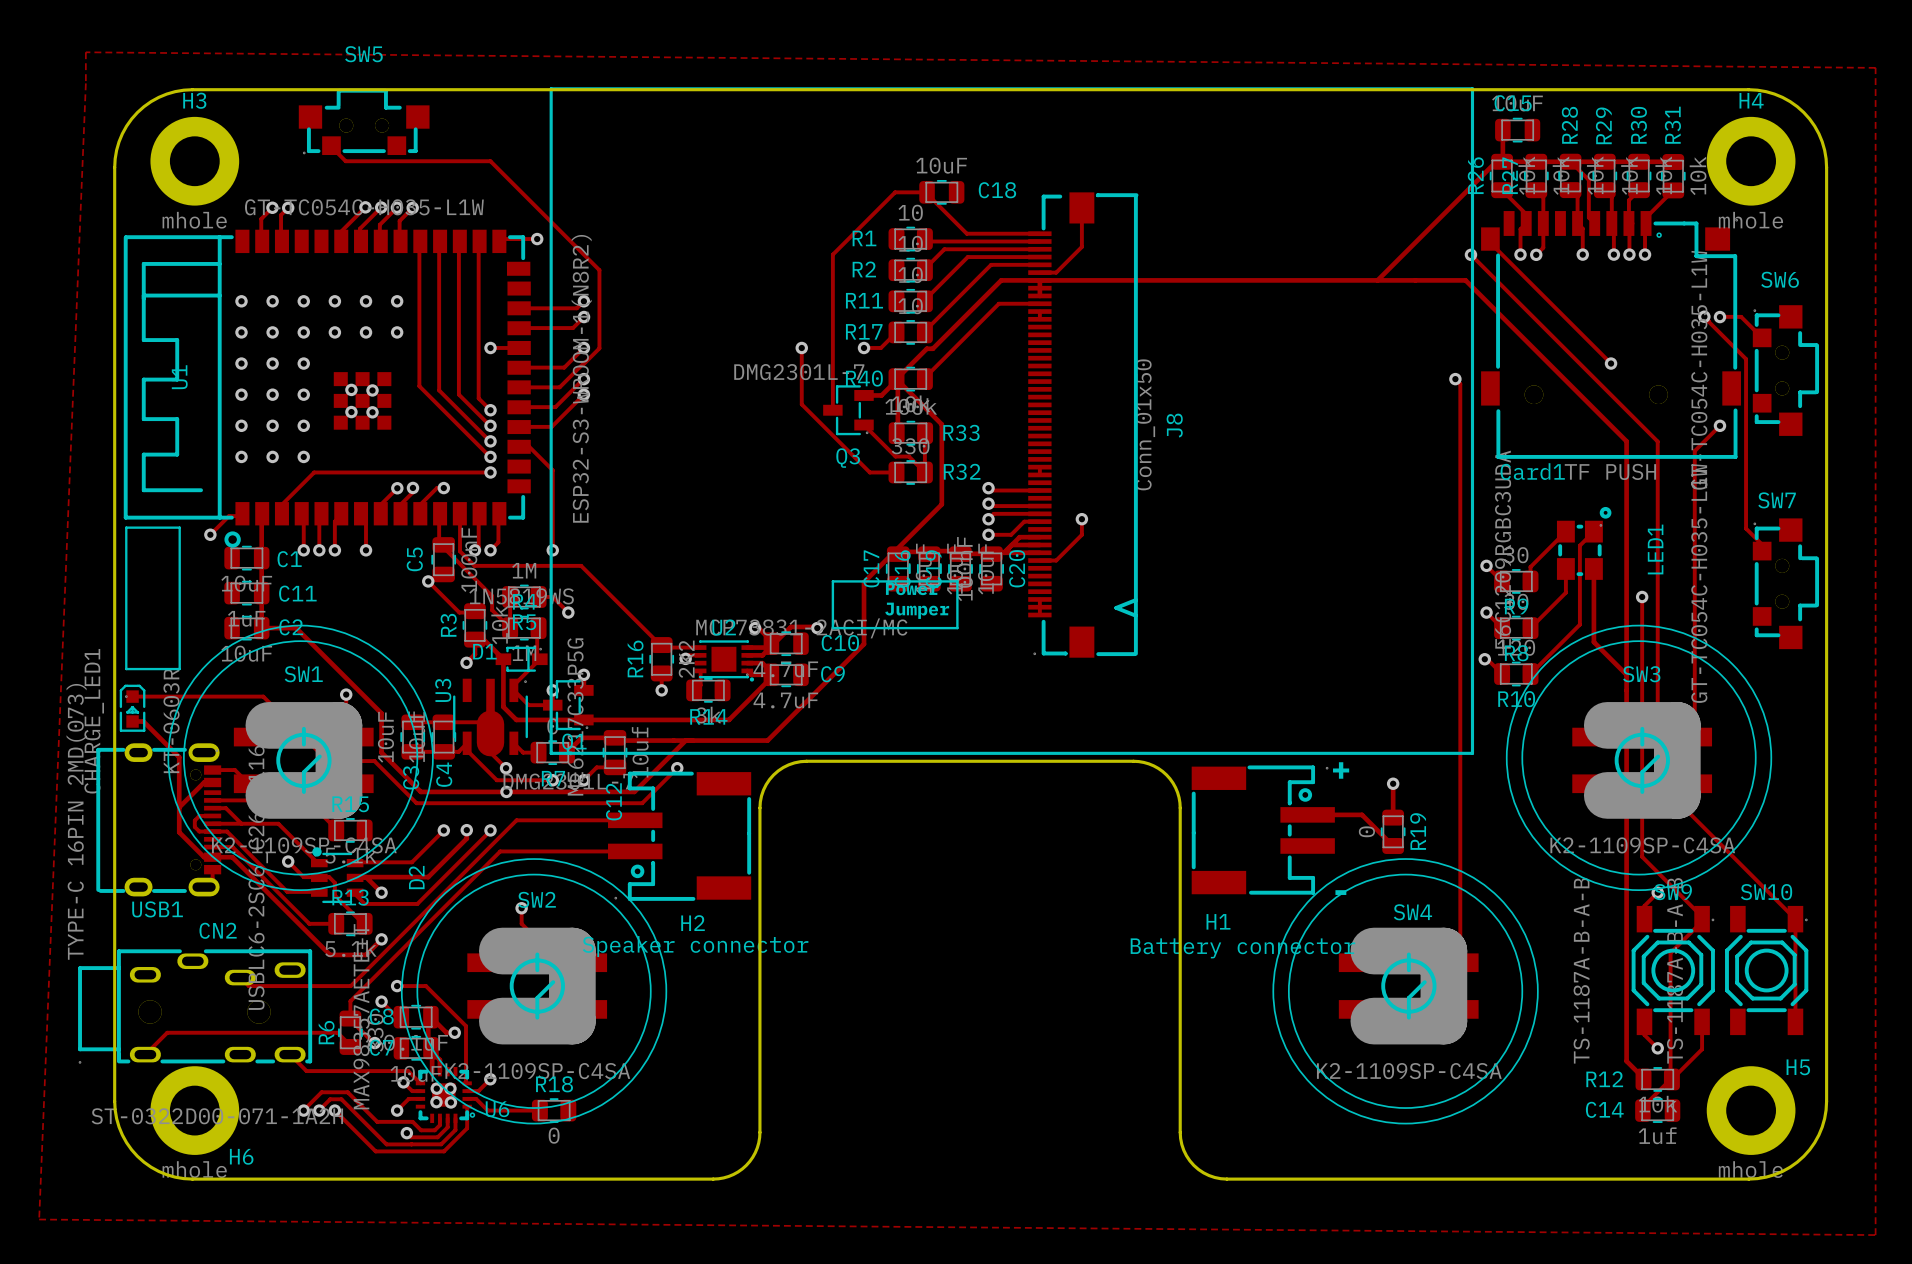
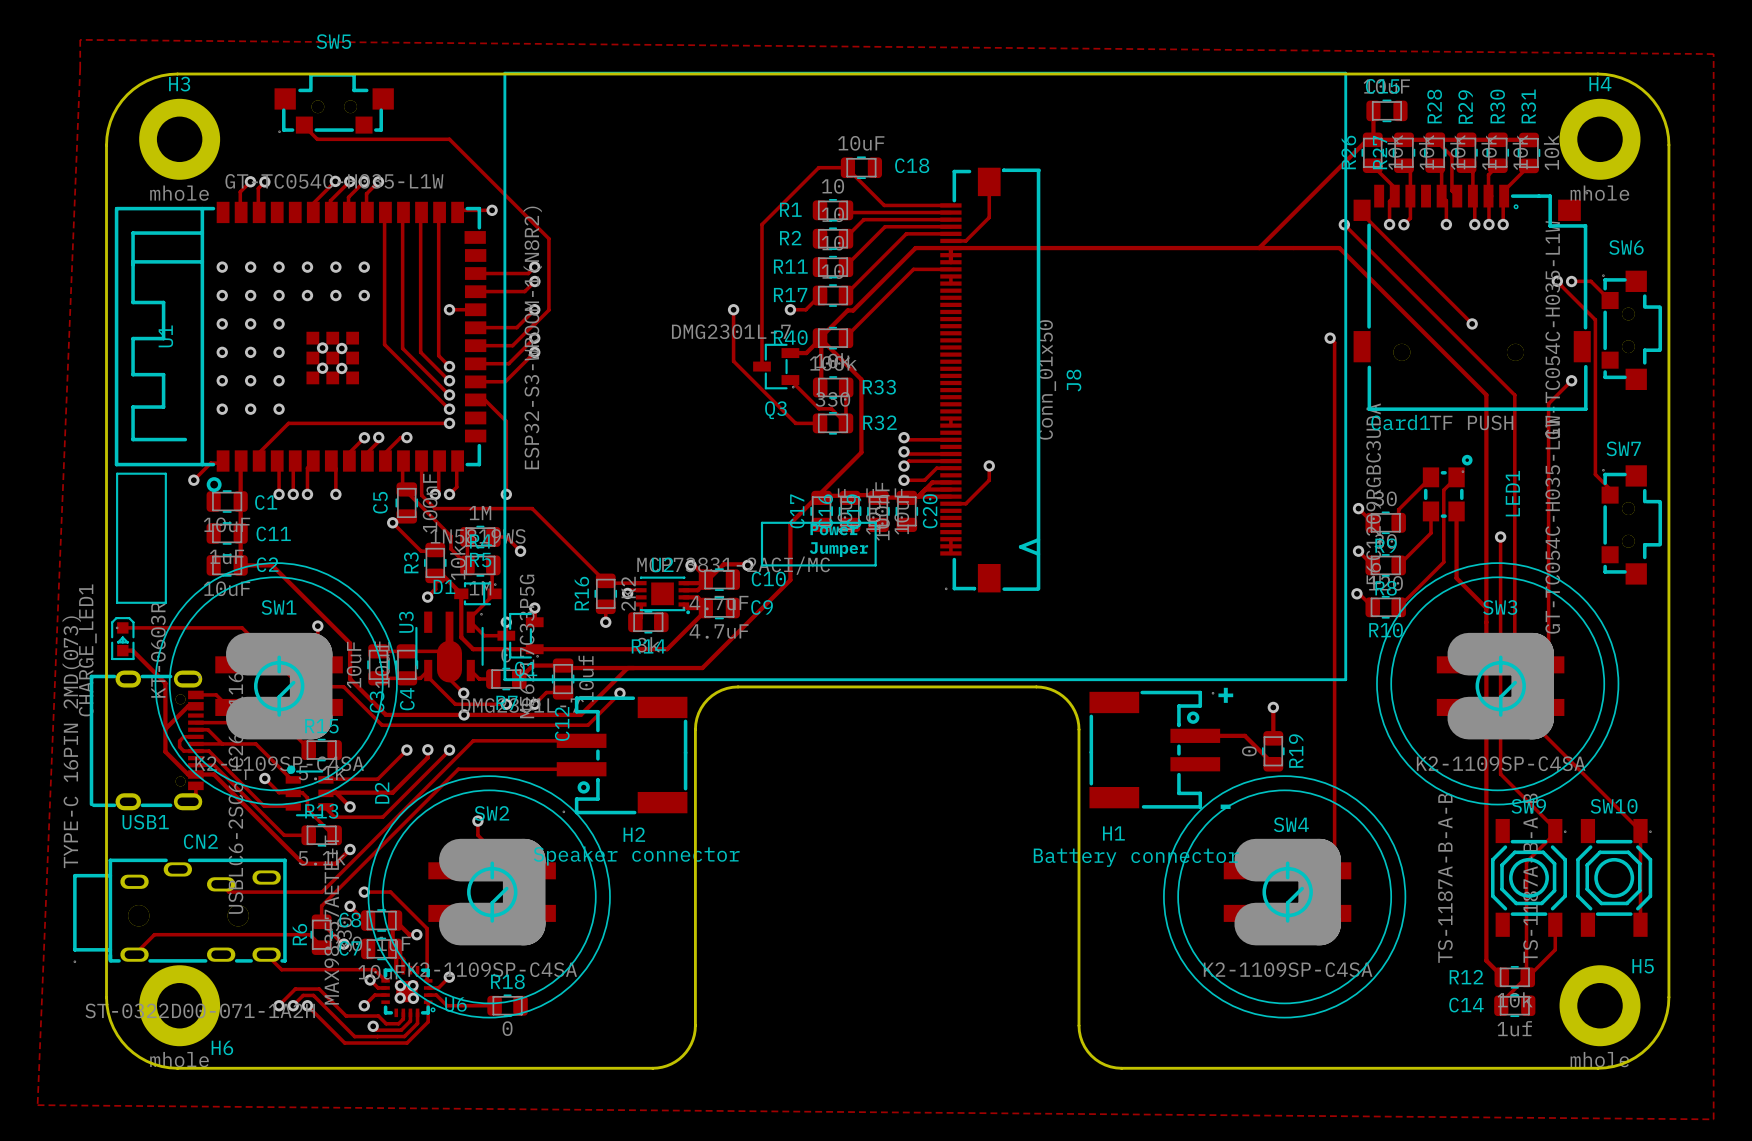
track: (1657, 892) (1644, 905) (1644, 919) -> none
via: (1657, 892) -> none
track: (1644, 1021) (1644, 1035) (1657, 1048) -> none
via: (1657, 1048) -> none

